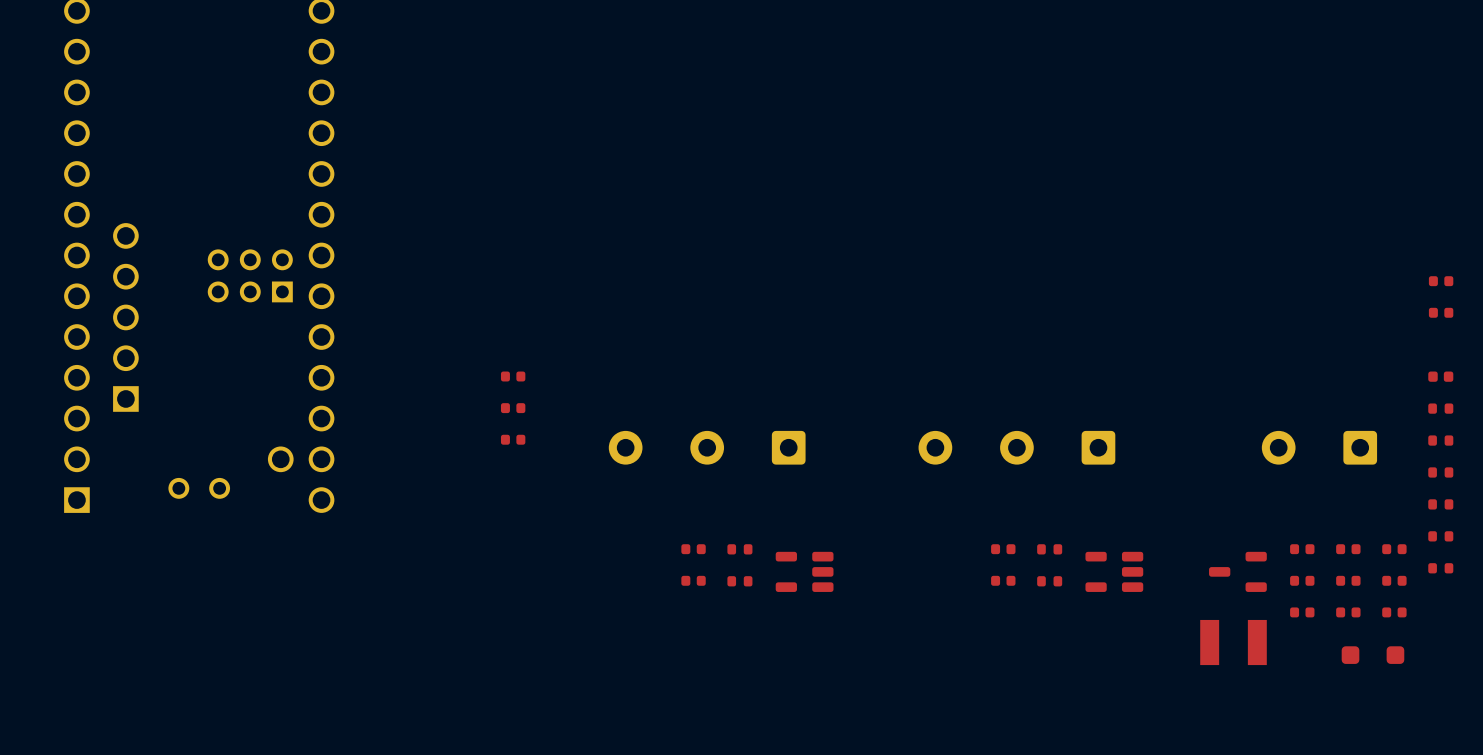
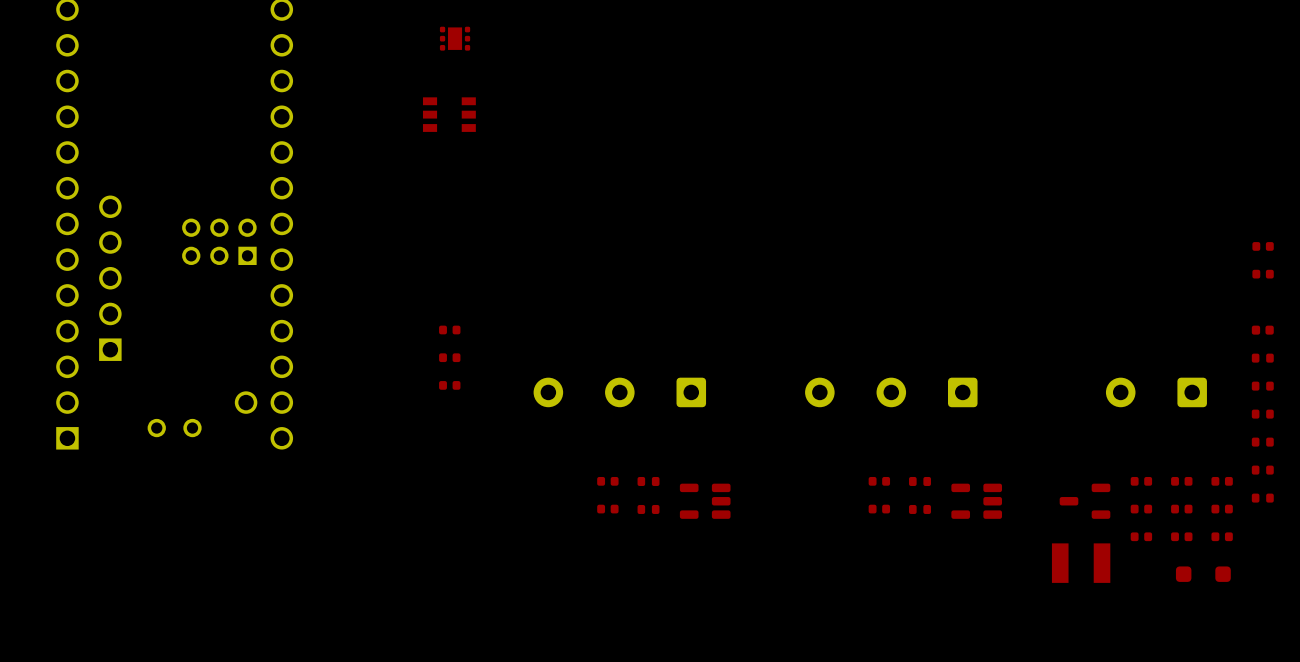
part: none -> (455, 38)
part: none -> (449, 114)

